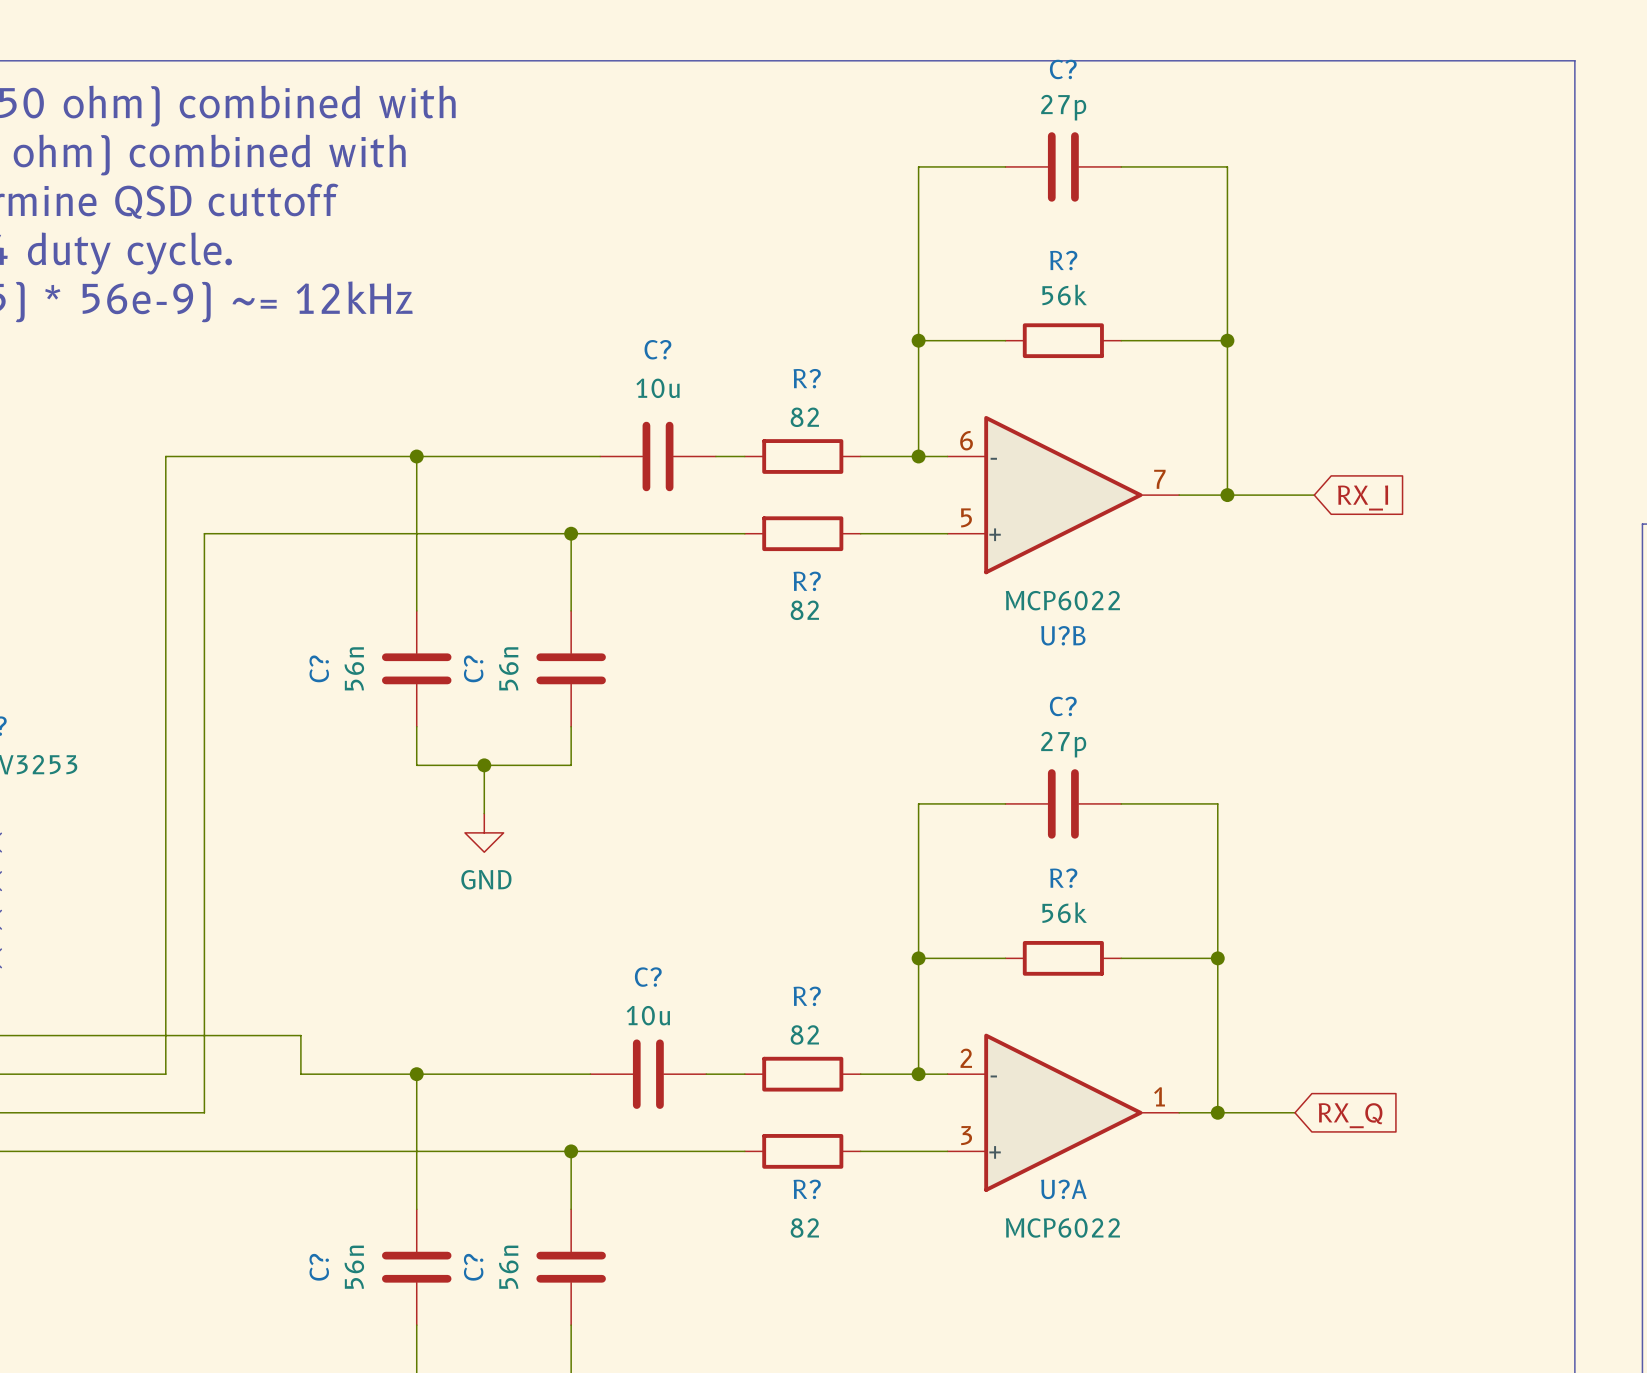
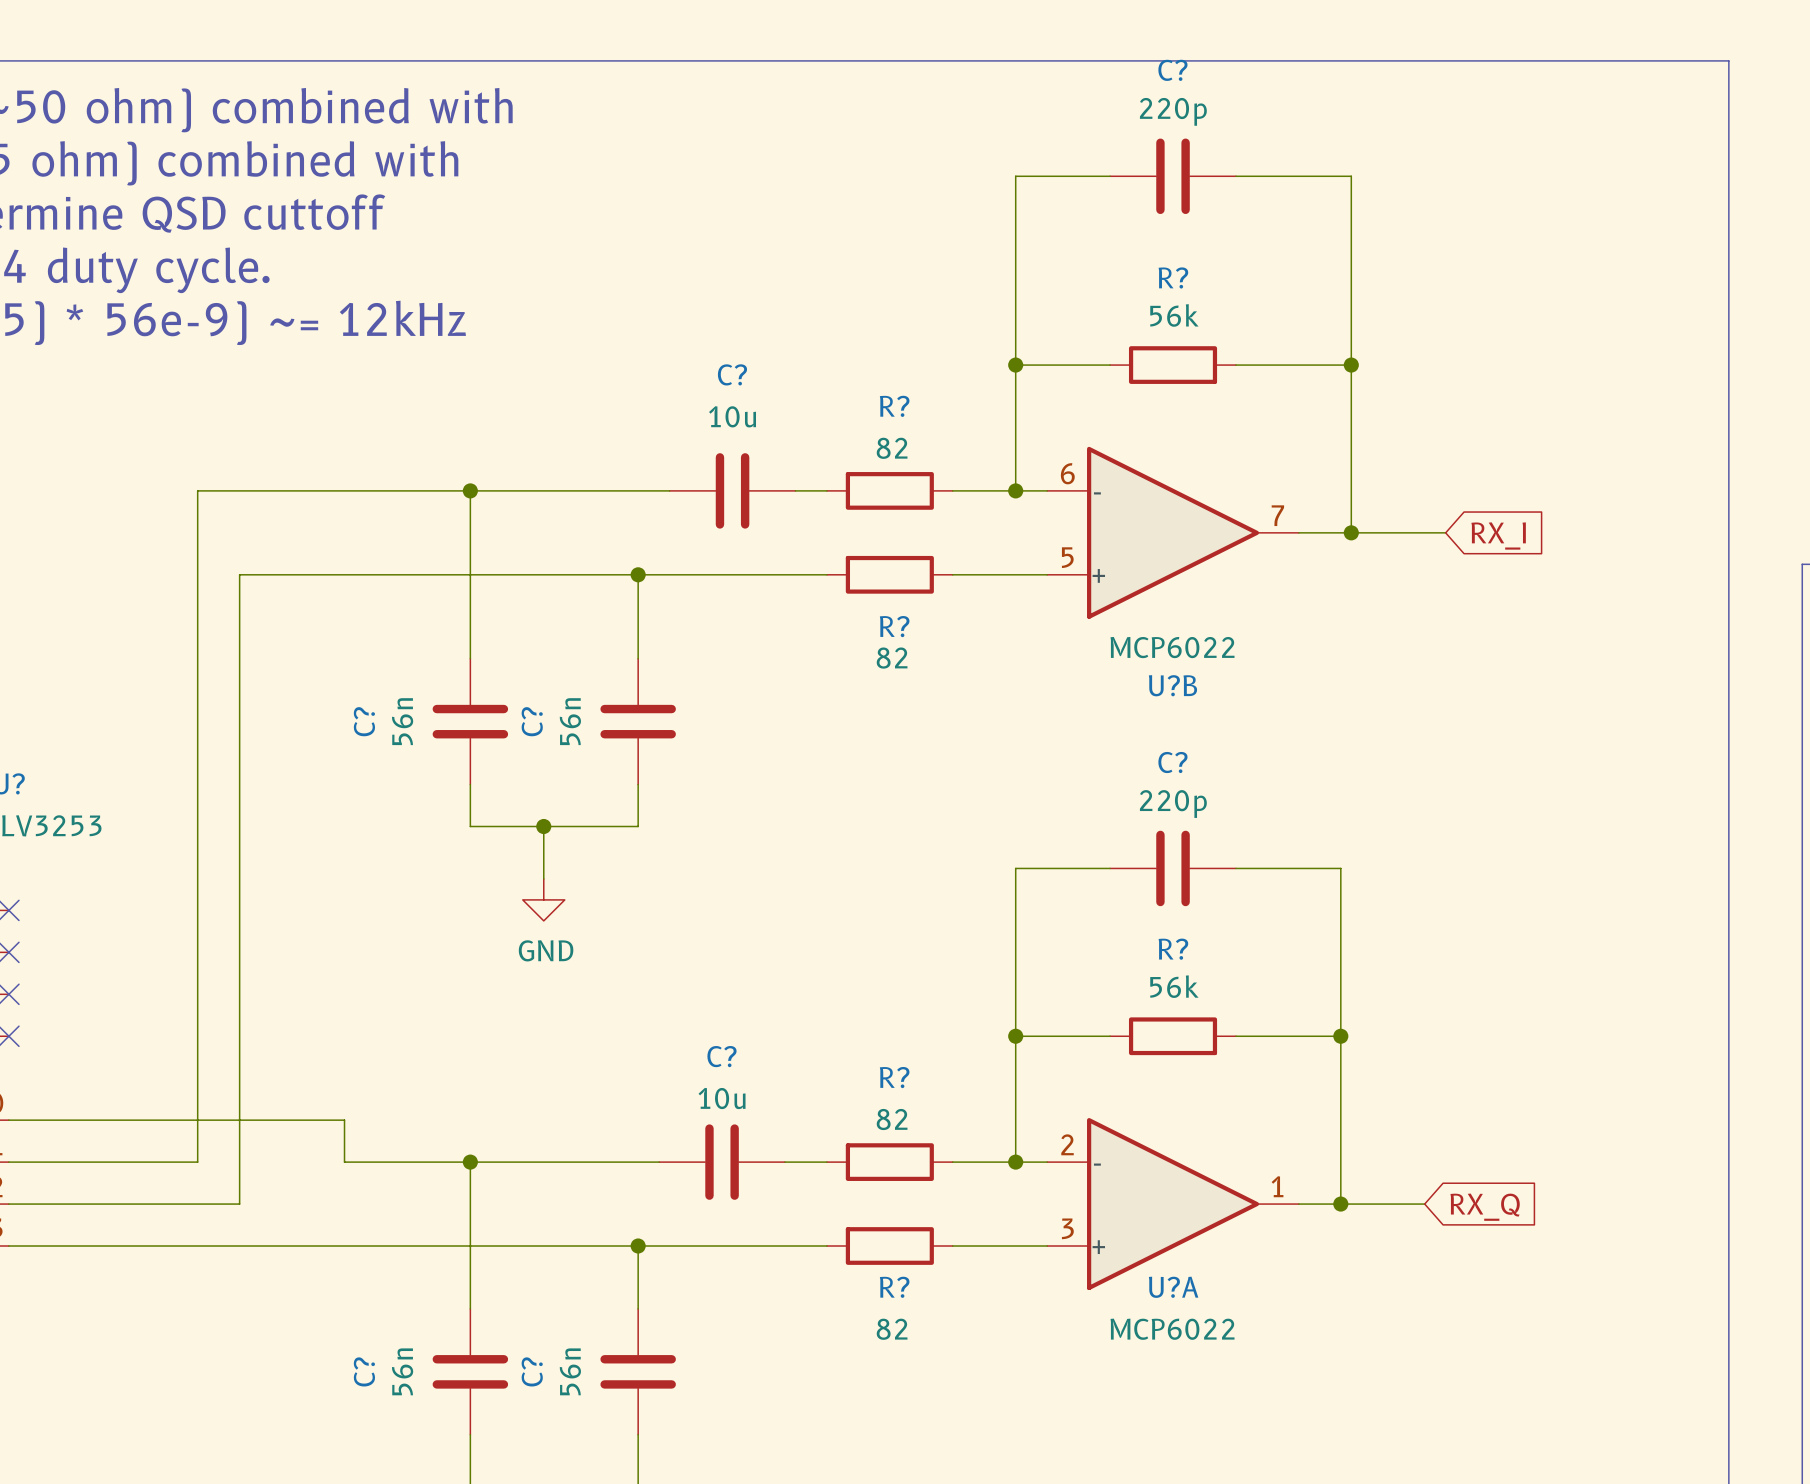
C? value: 27p (1063, 107) -> 220p (1173, 111)
C? value: 27p (1063, 744) -> 220p (1173, 804)

